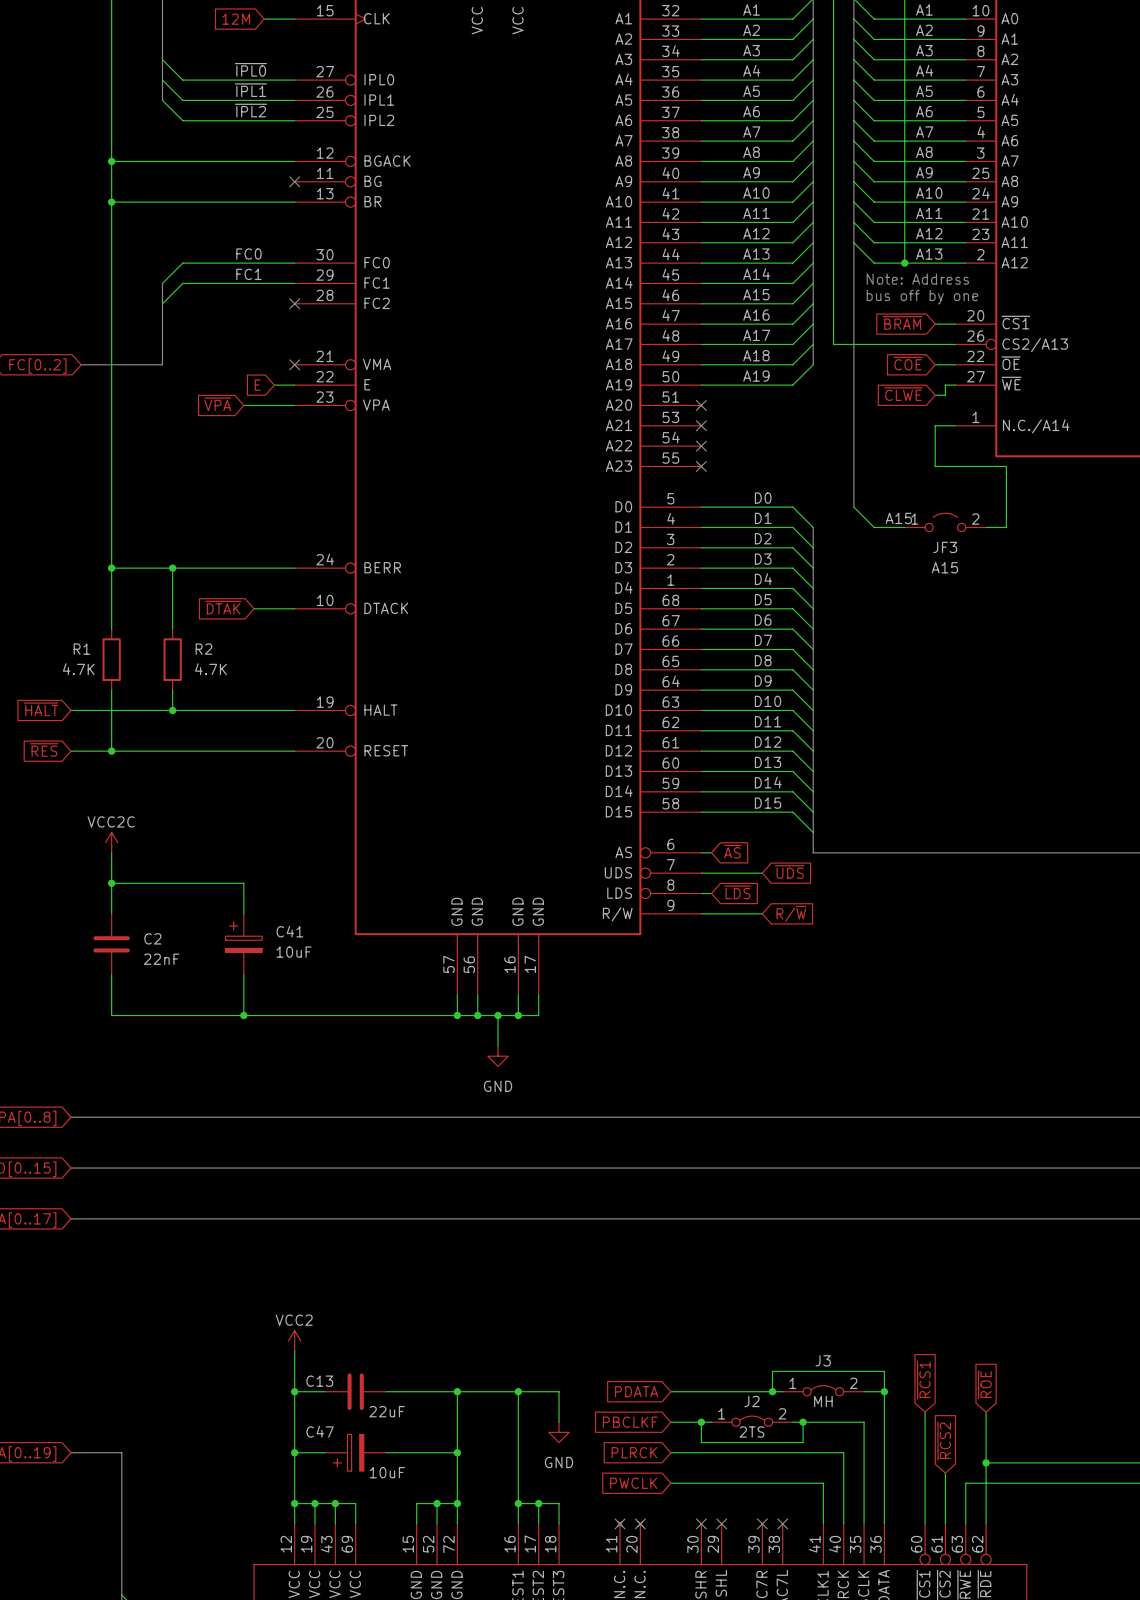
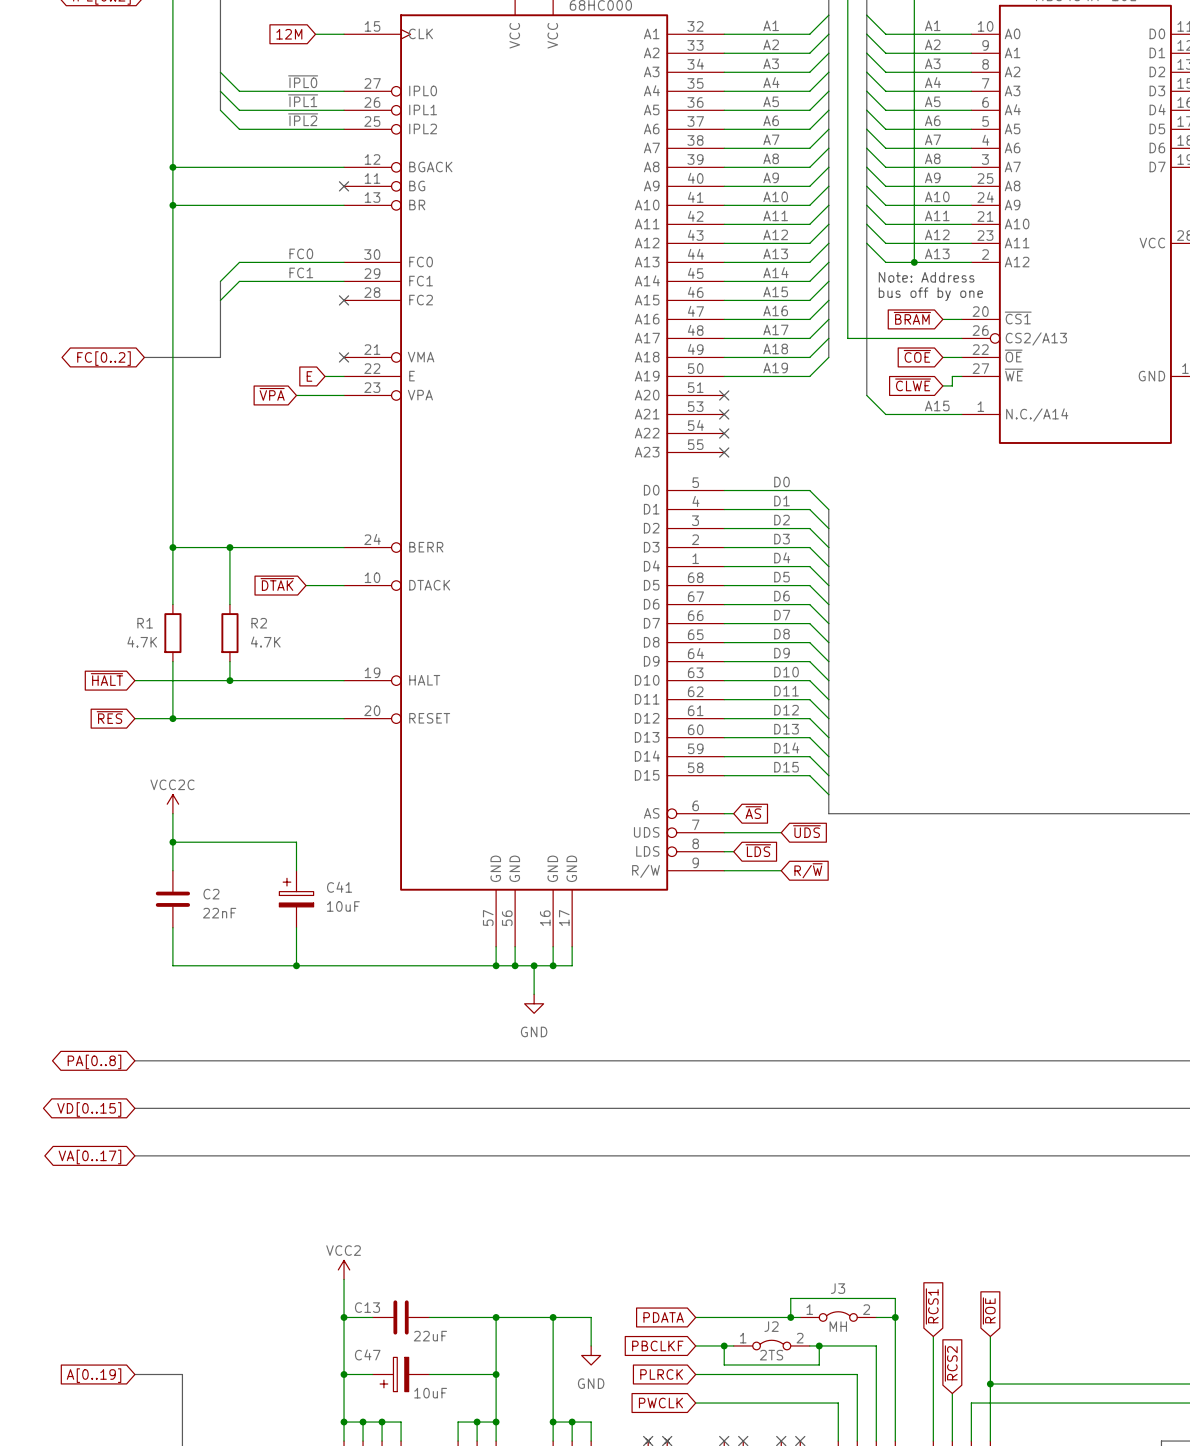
bus: (853, 405) (853, 507) -> none
wire: (935, 425) (935, 466) (1006, 466) (1006, 527) (986, 527) -> (942, 414) (885, 414) (866, 395)
wire: (853, 507) (874, 527) (904, 527) -> none
label position: A15 (898, 518) -> A15 (937, 405)
JF3: A15 (945, 522) -> none

